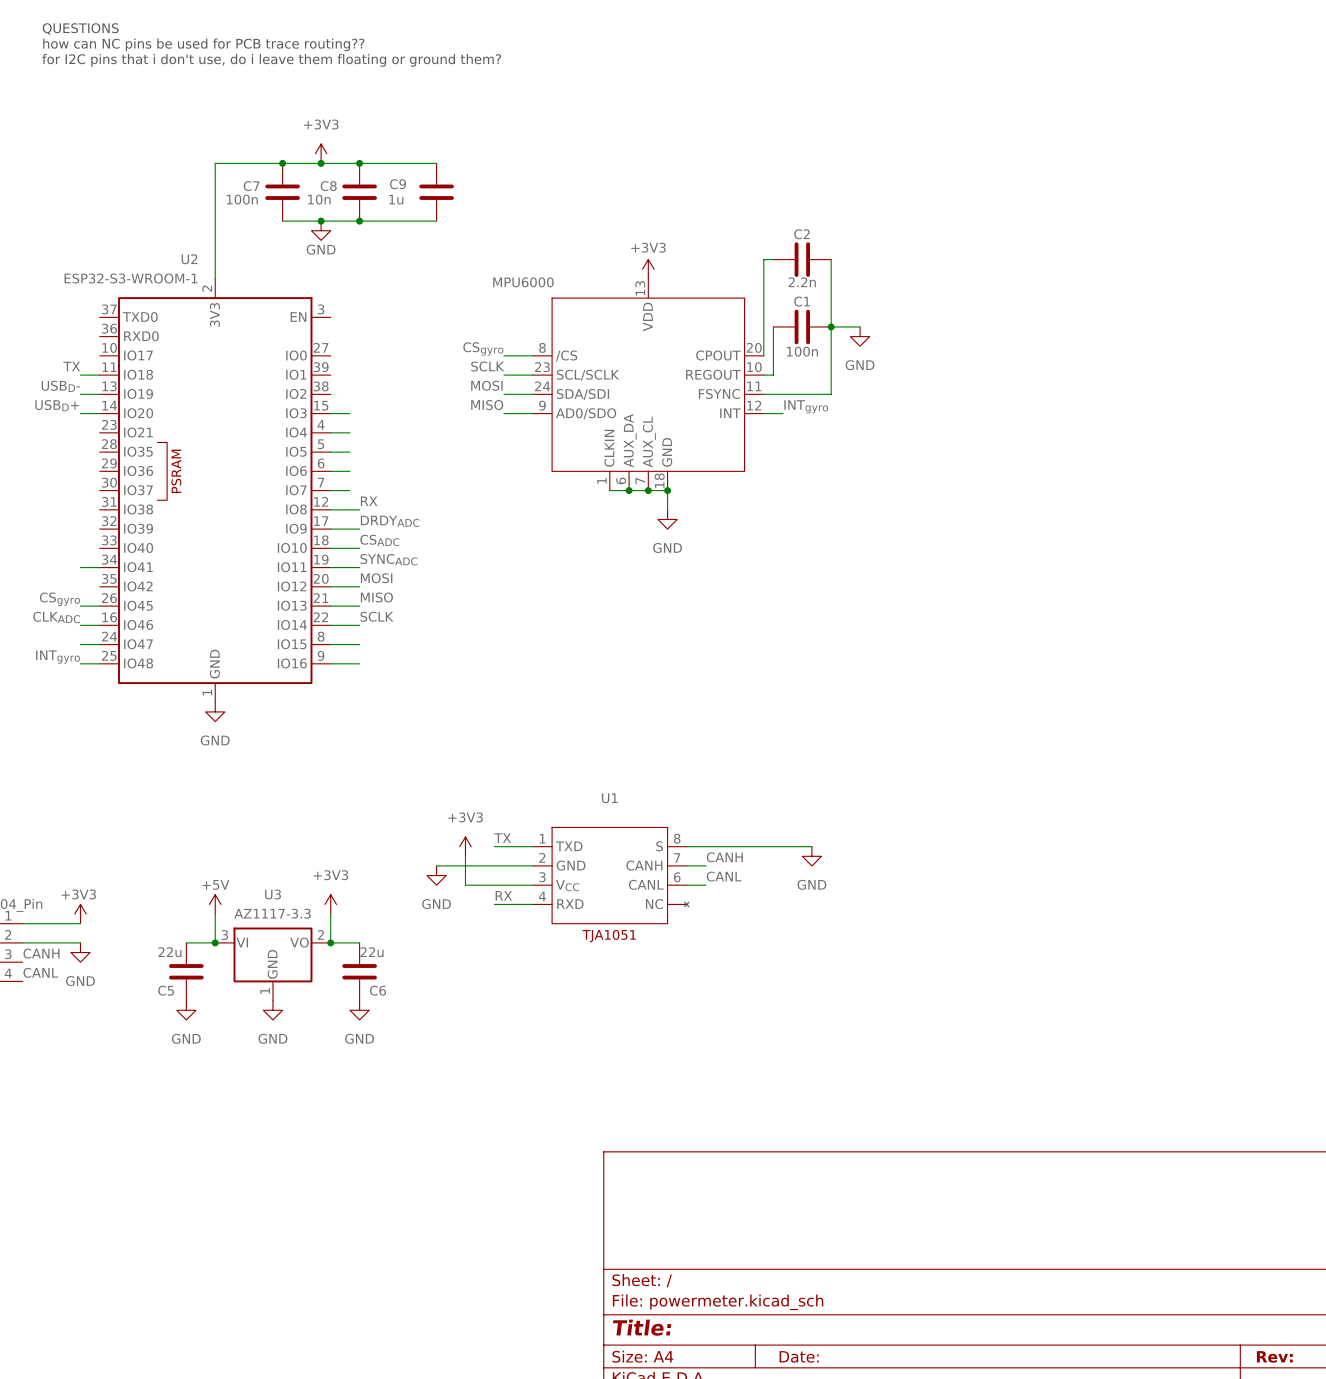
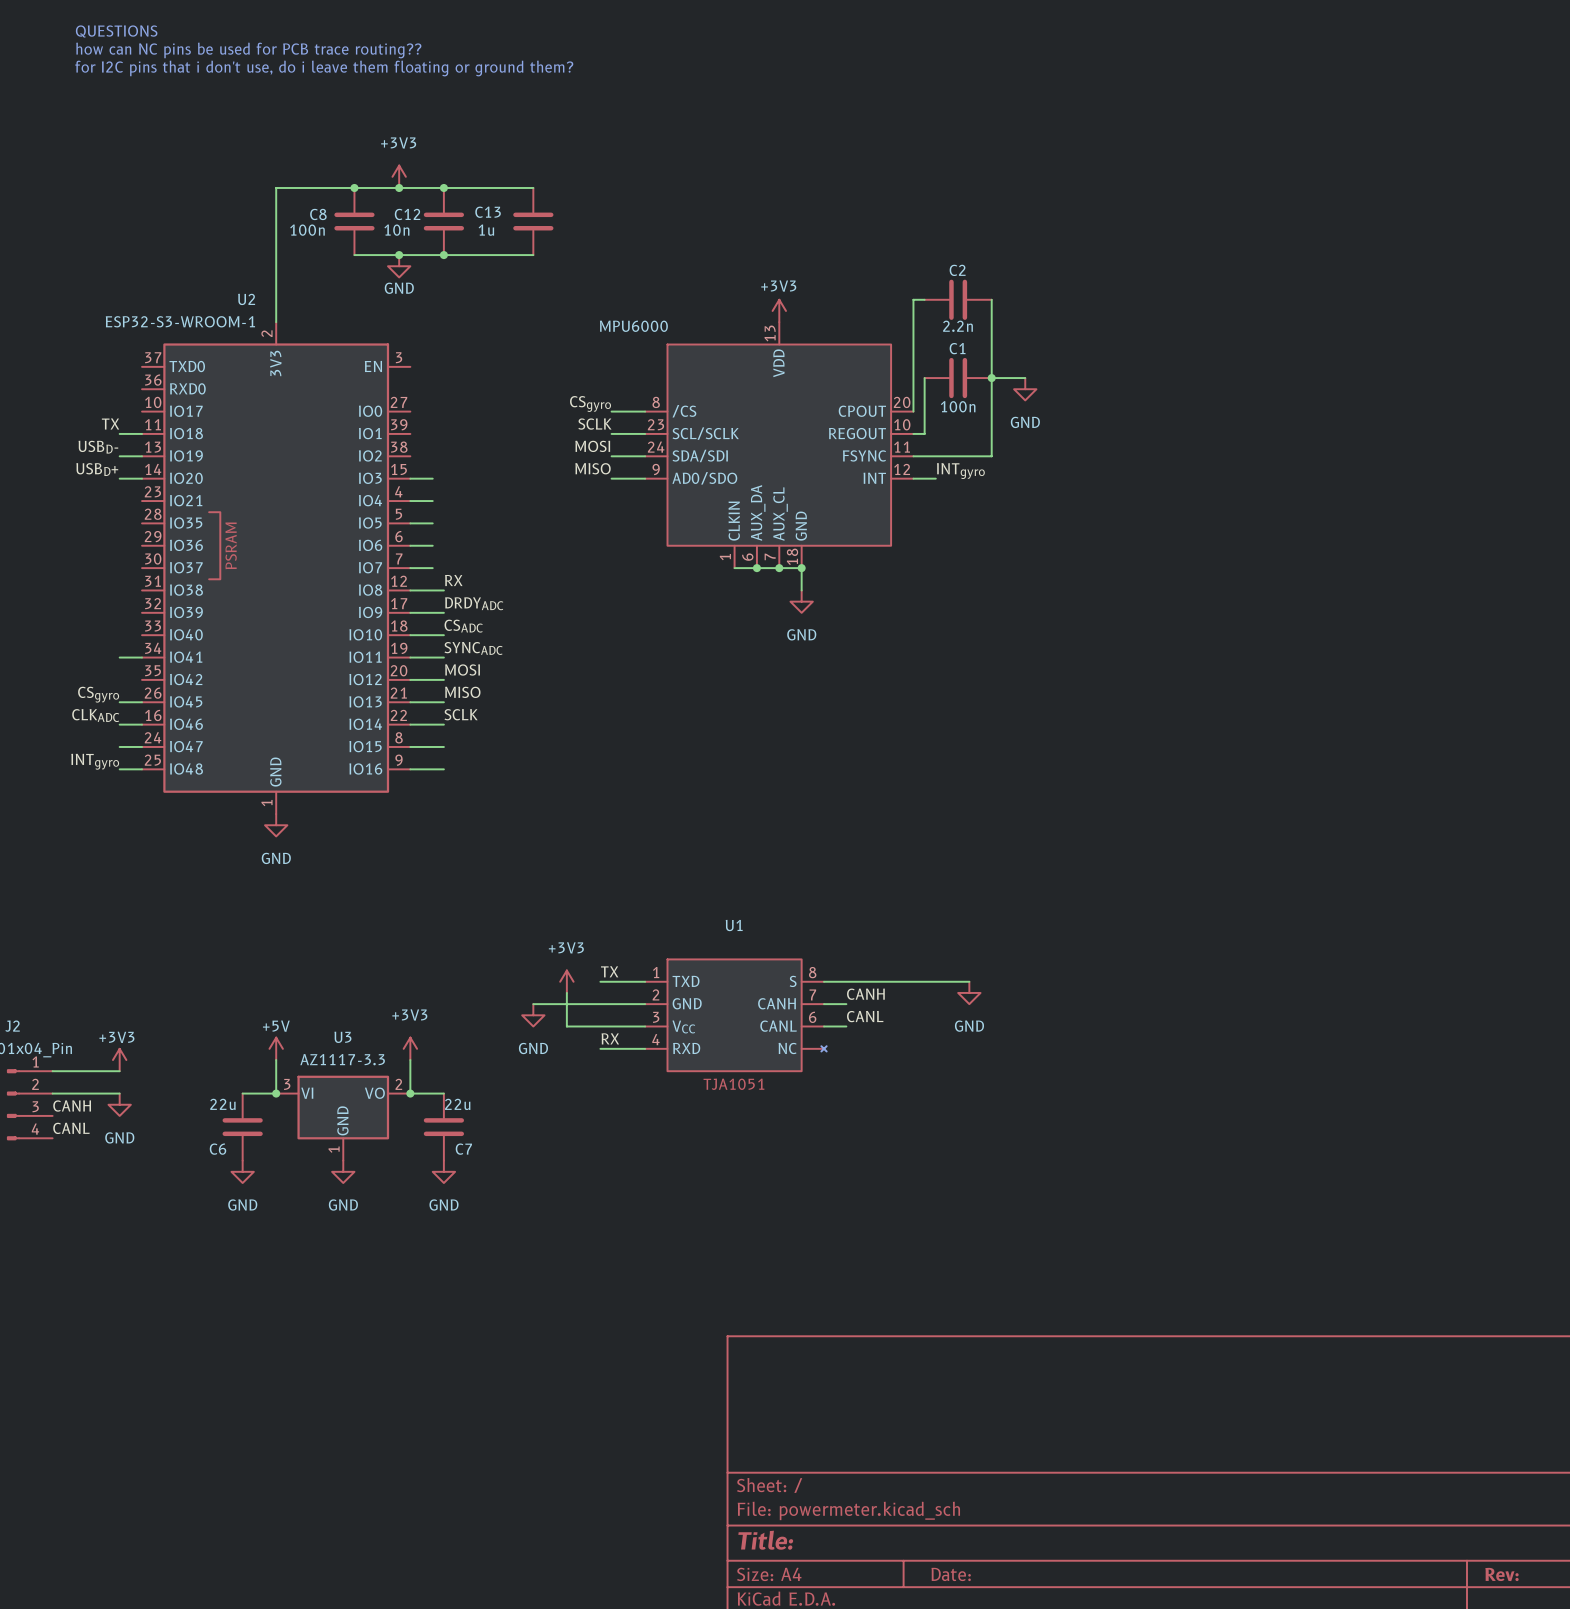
C9 name: C9 (398, 184) -> C13 (488, 212)
C7 name: C7 (251, 186) -> C8 (318, 214)
C8 name: C8 (328, 186) -> C12 (407, 214)
C5 name: C5 (166, 990) -> C6 (218, 1149)
C6 name: C6 (377, 990) -> C7 (463, 1149)

